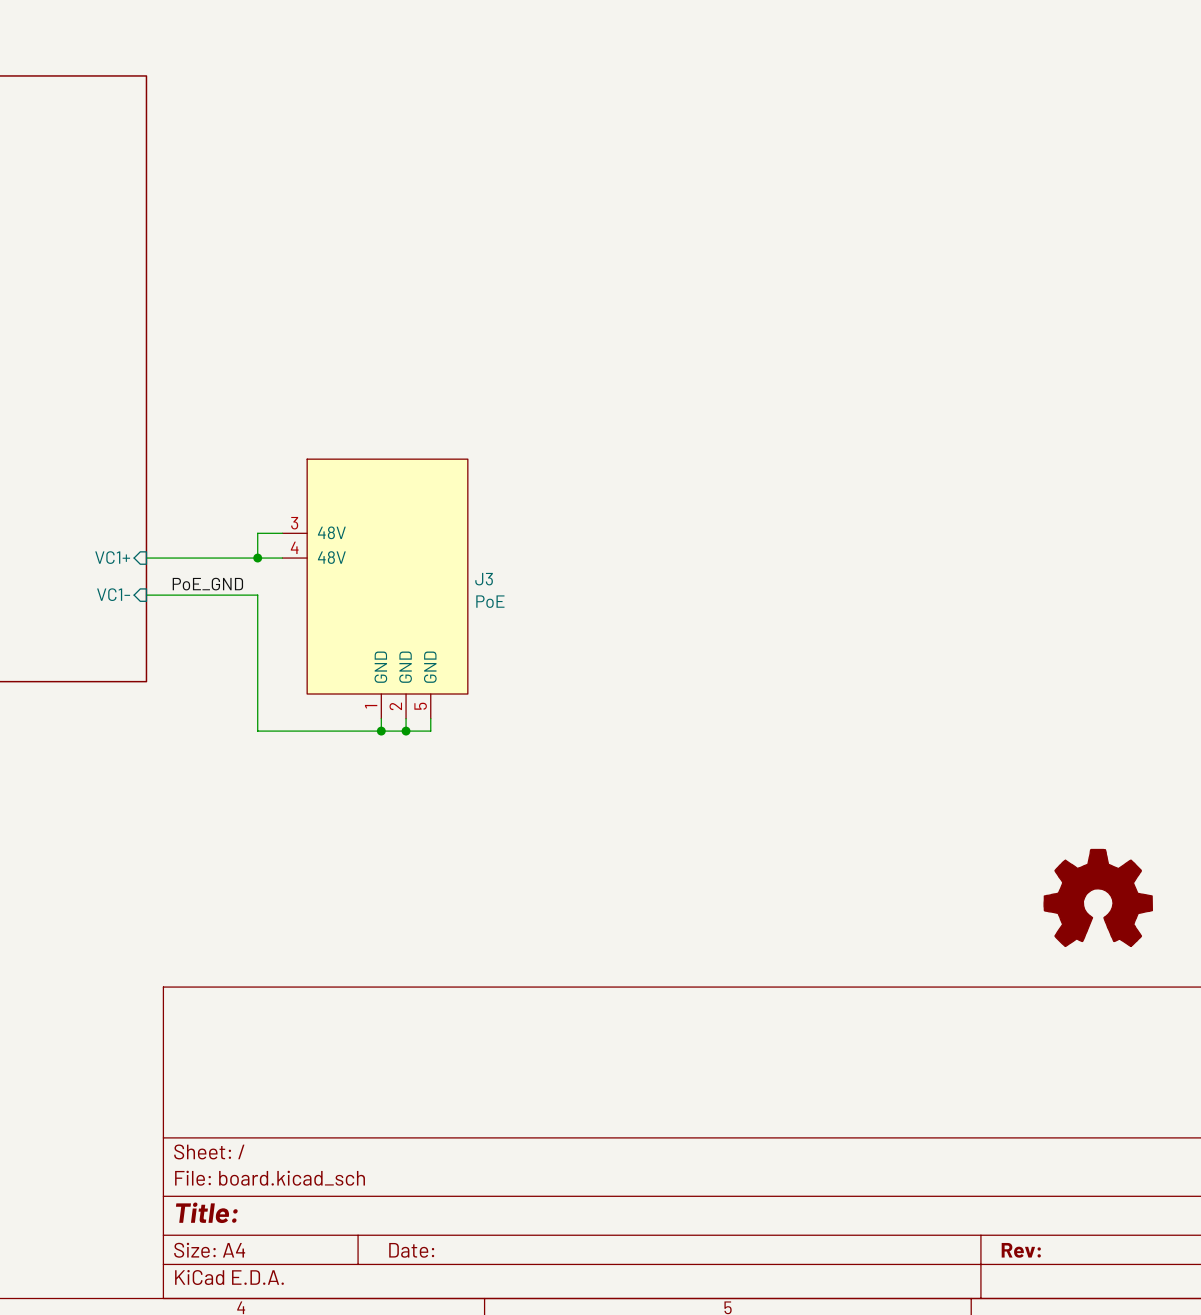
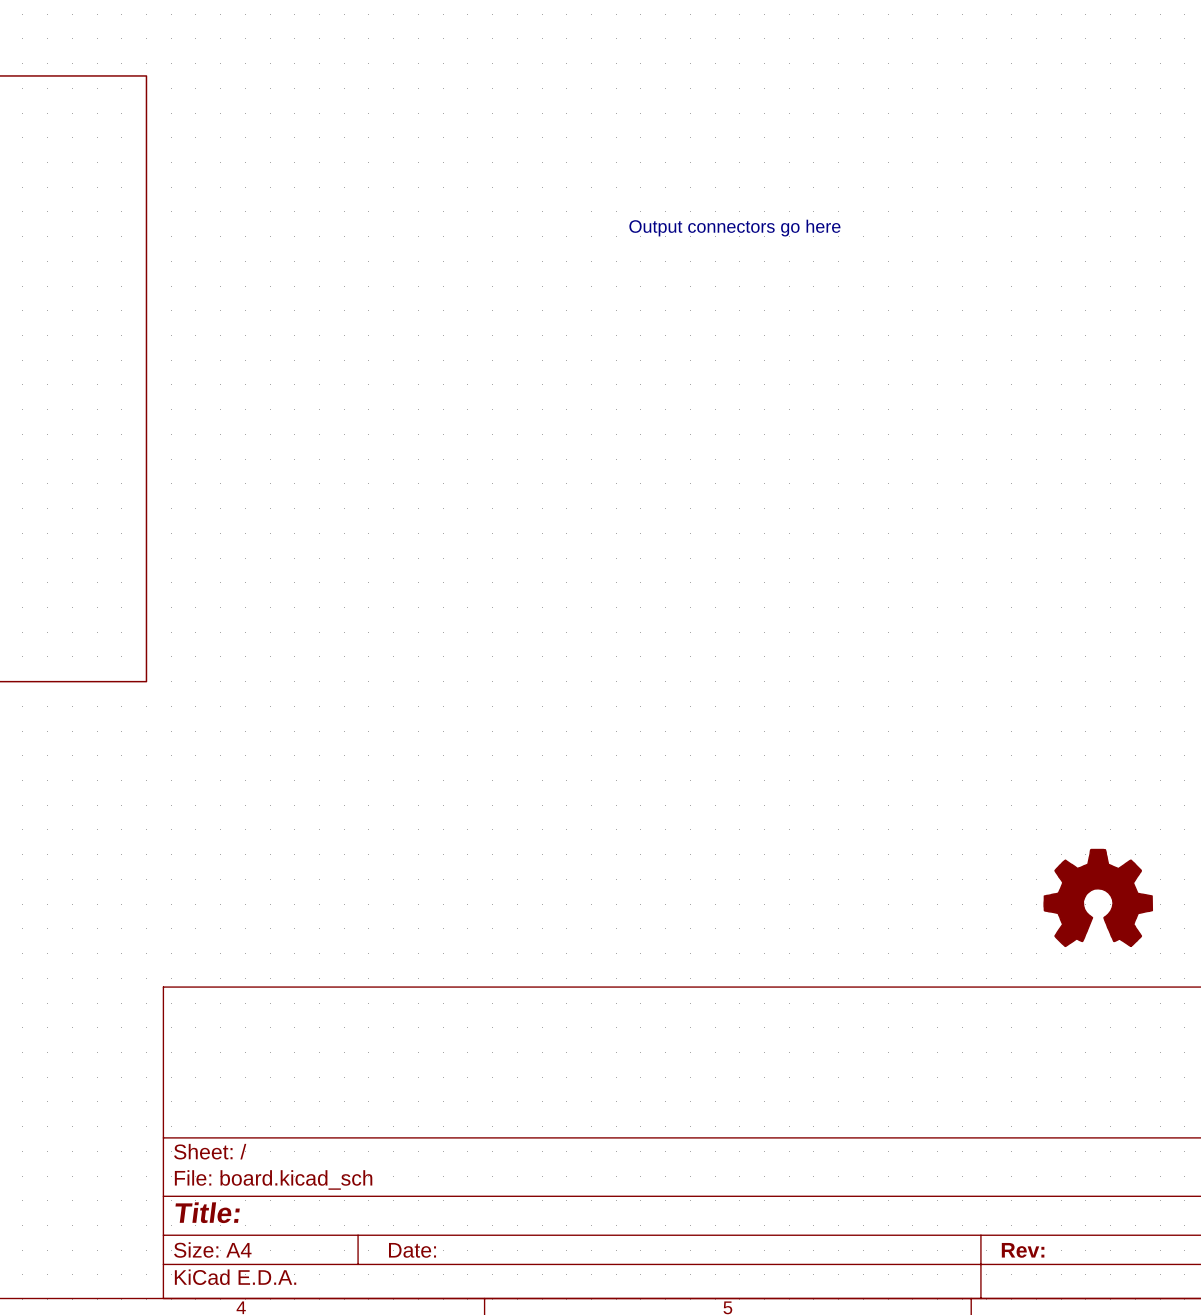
text: none -> Output connectors go here (734, 228)
wire: (282, 533) (257, 533) (257, 558) -> none
sheet pin: VC1+ (112, 557) -> none
wire: (146, 558) (282, 558) -> none
junction: (257, 558) -> none
label: PoE_GND (207, 584) -> none
J3: PoE (375, 588) -> none
sheet pin: VC1- (113, 594) -> none
wire: (146, 595) (257, 595) (257, 731) (430, 731) (430, 718) -> none
wire: (381, 718) (381, 731) -> none
wire: (406, 718) (406, 731) -> none
junction: (381, 731) -> none
junction: (406, 731) -> none

